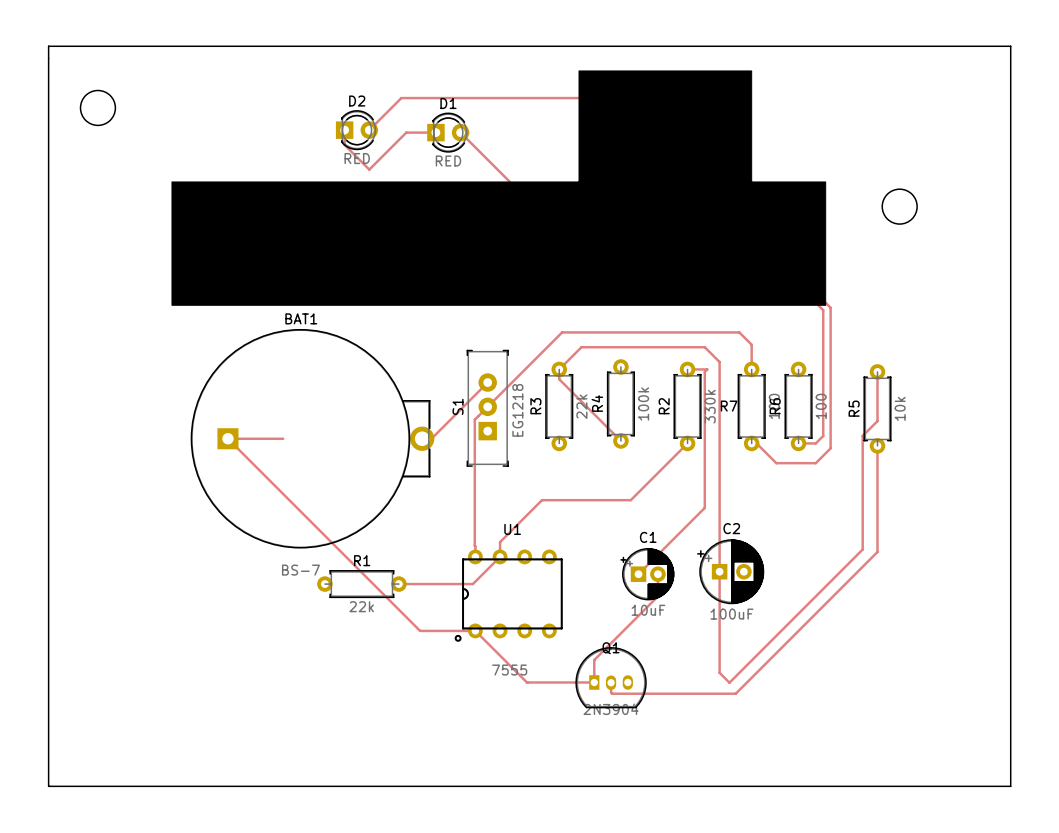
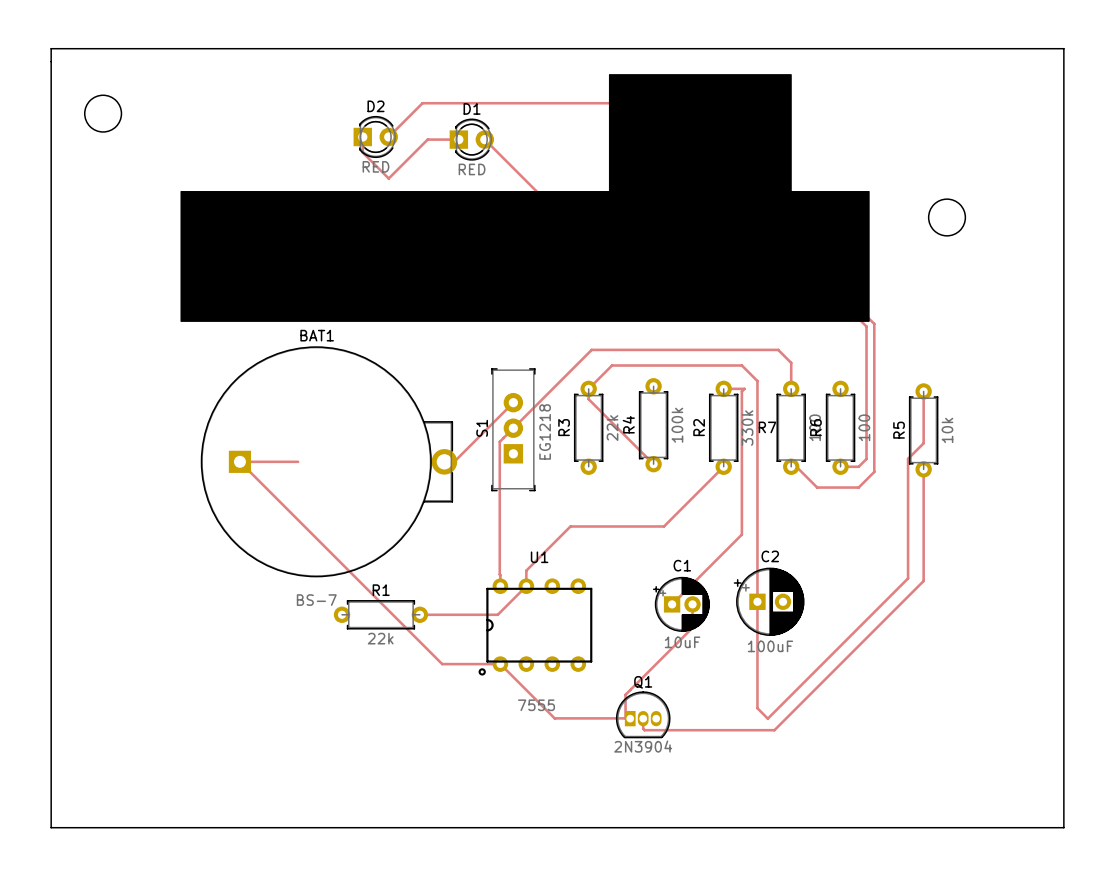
Q1 footprint: [575, 647, 647, 709] -> [616, 691, 671, 739]

